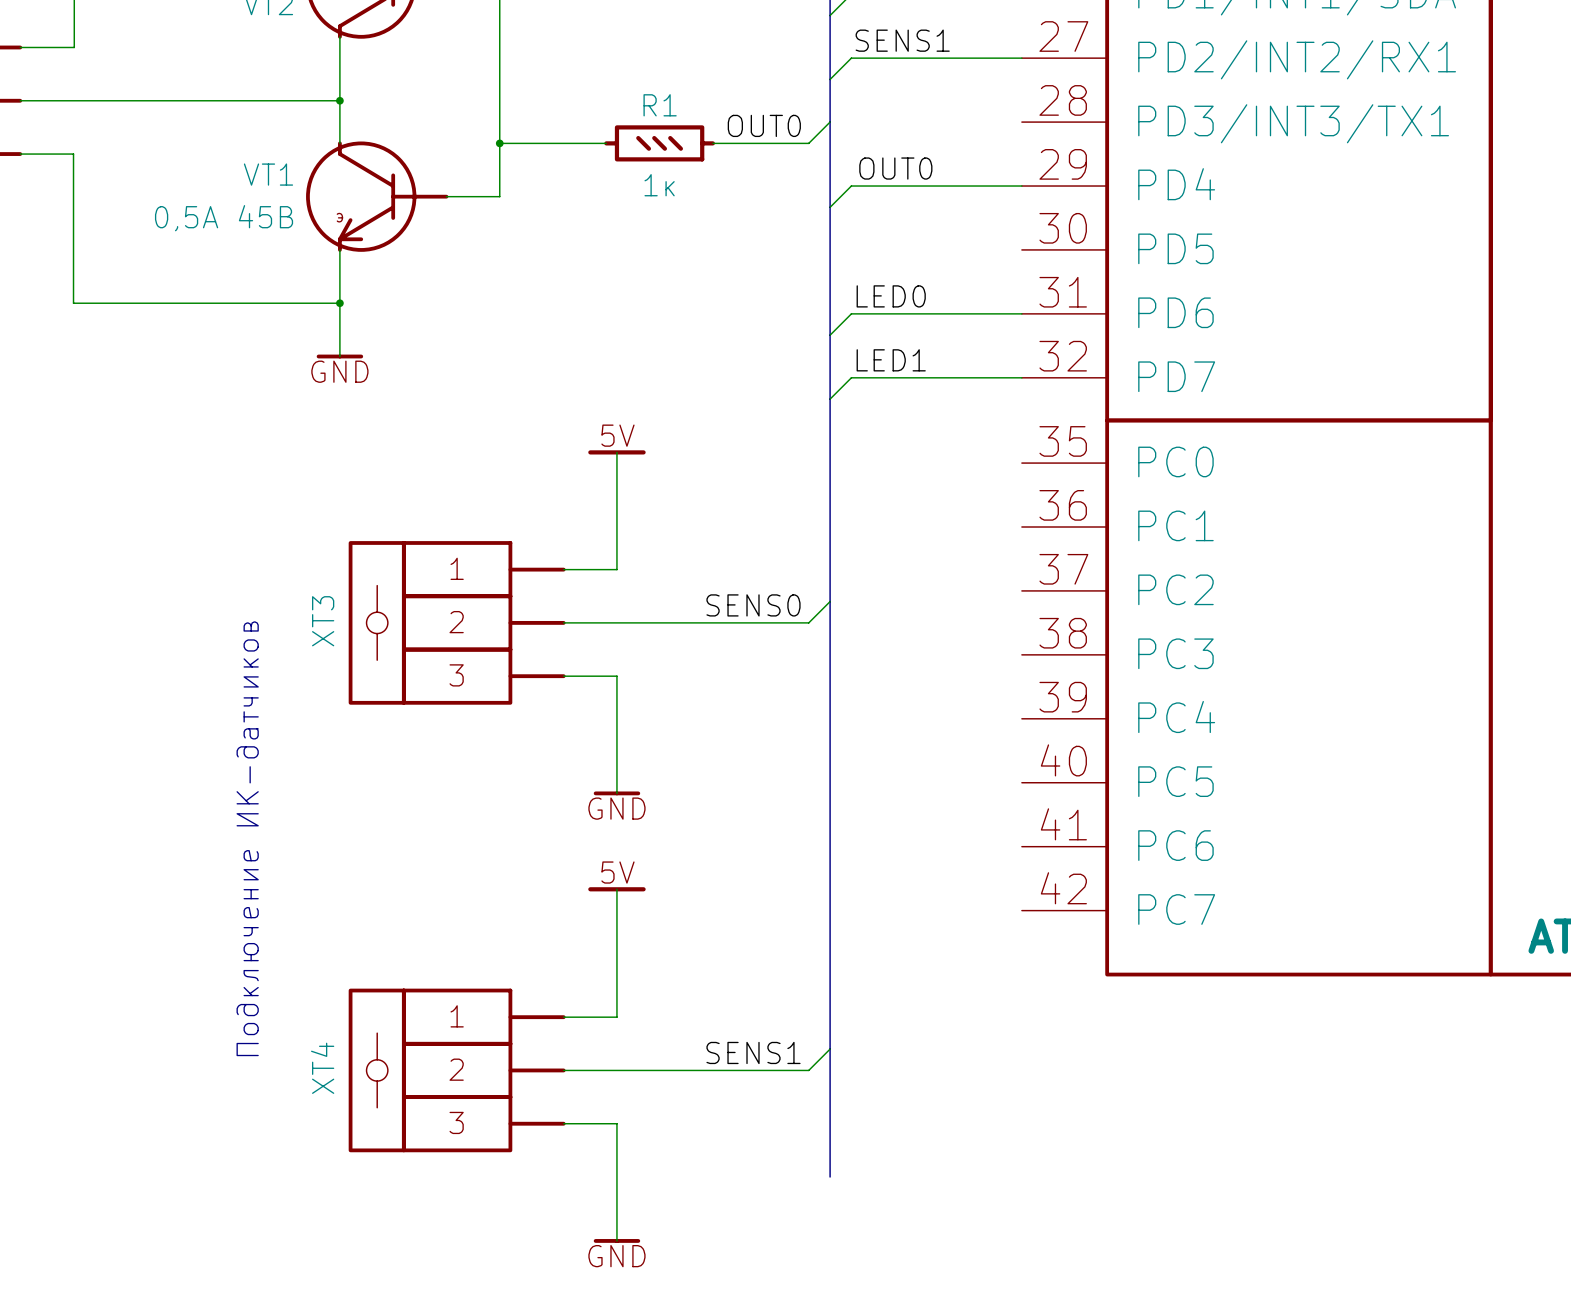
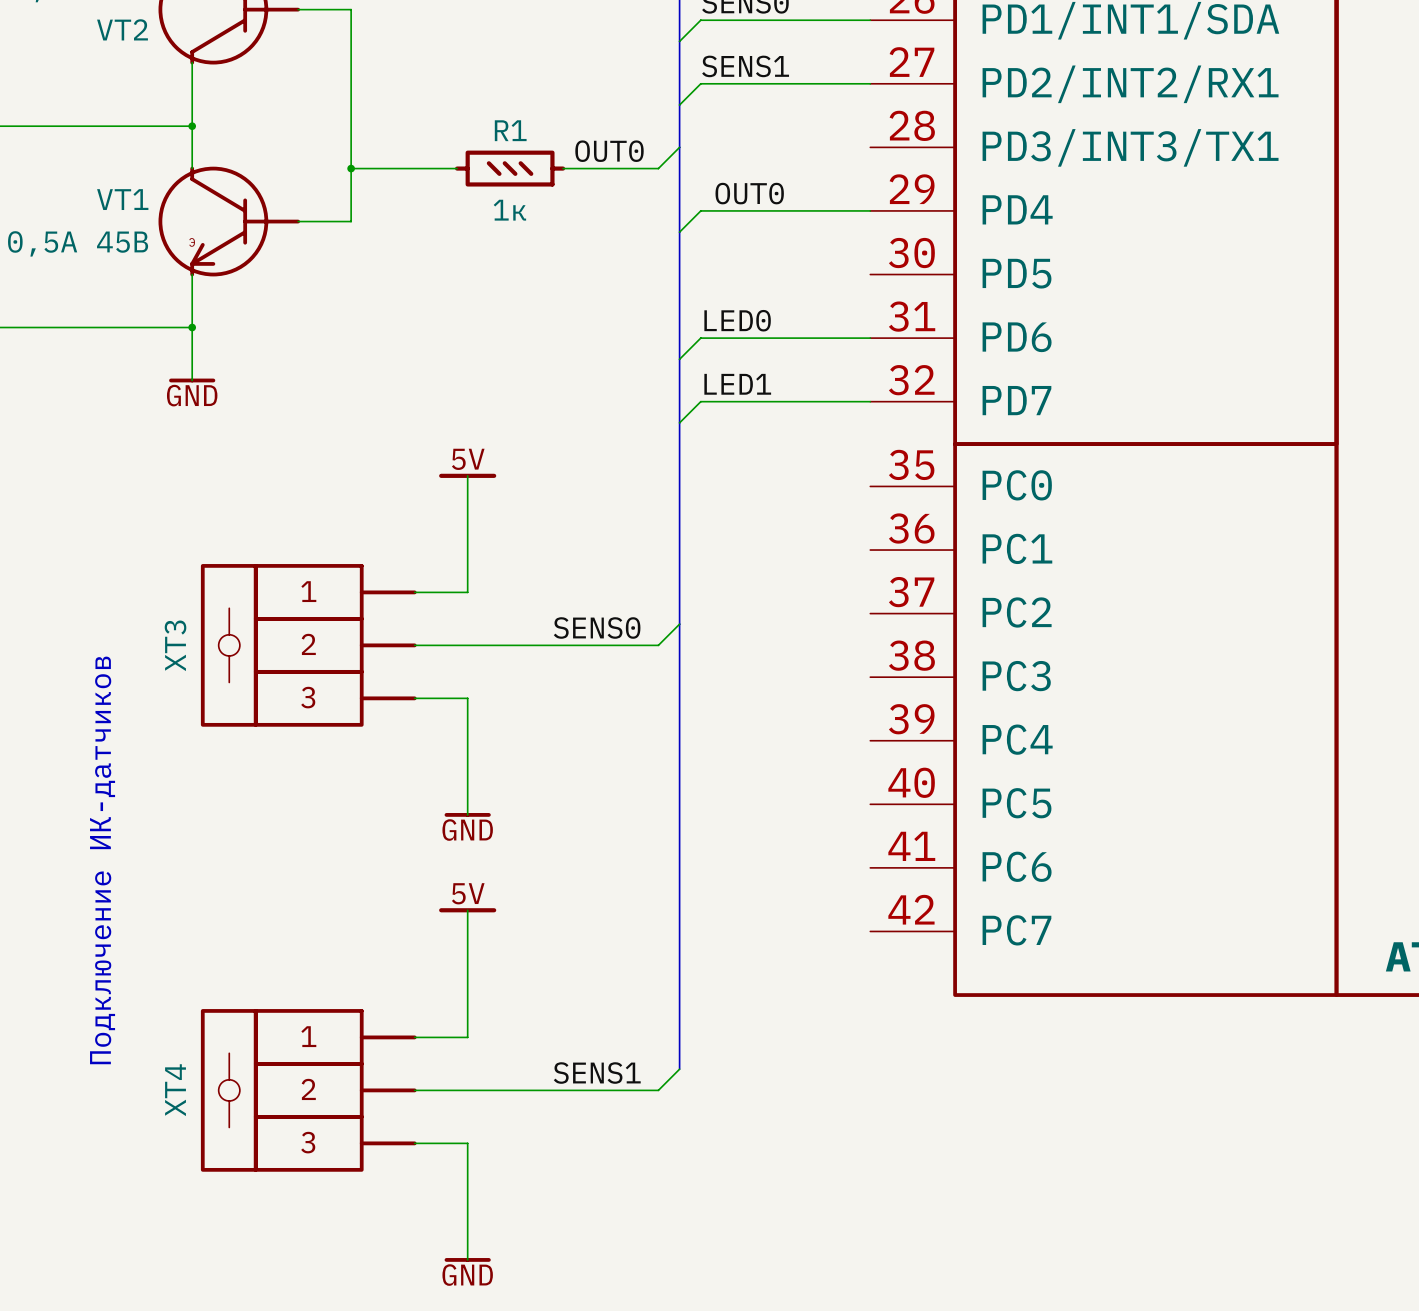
bus: (830, 1049) (830, 1177) -> none

